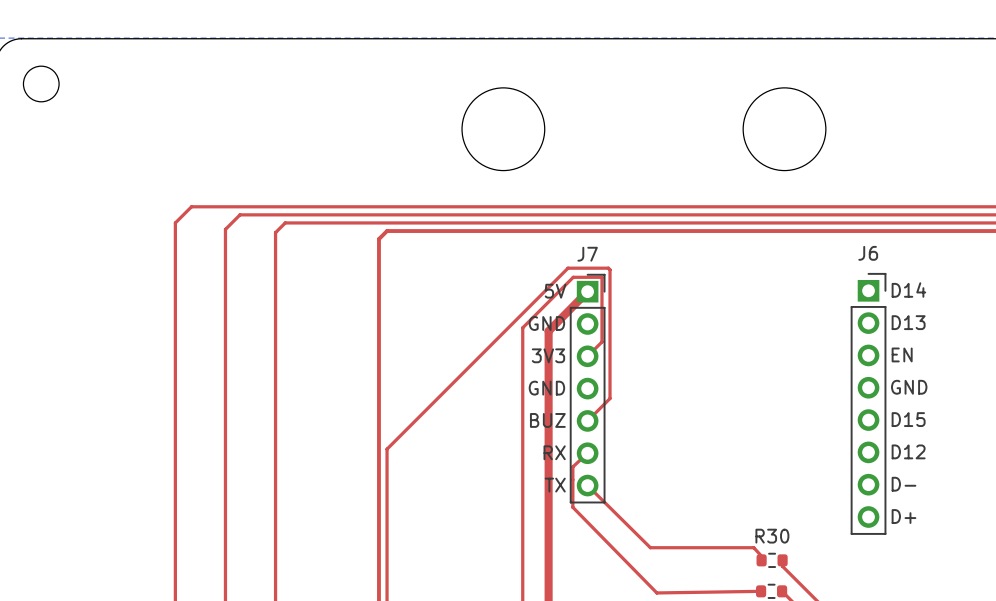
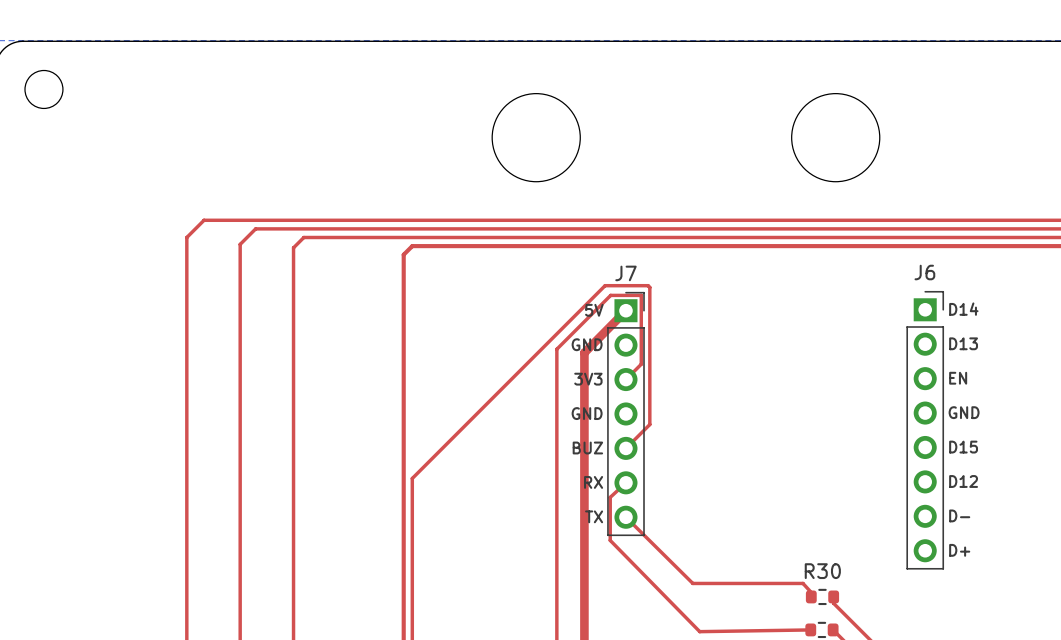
J6 footprint: [850, 272, 887, 535] -> [906, 290, 945, 570]
J7 footprint: [569, 273, 606, 504] -> [607, 291, 645, 537]

